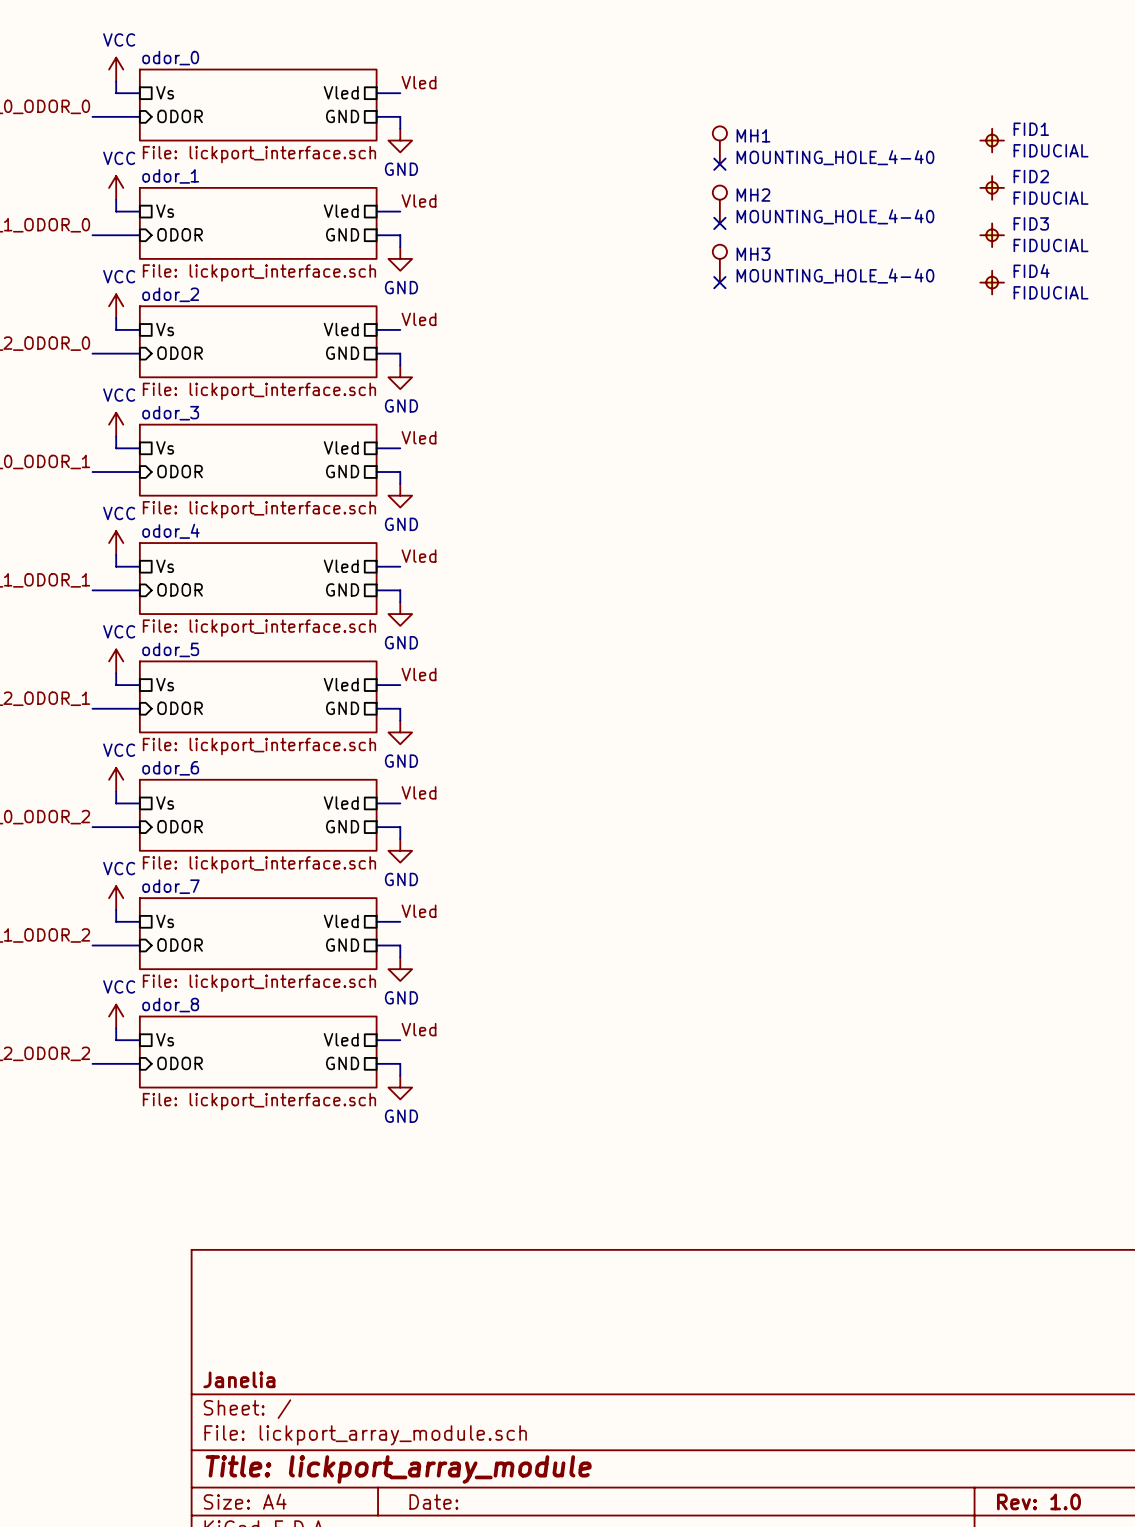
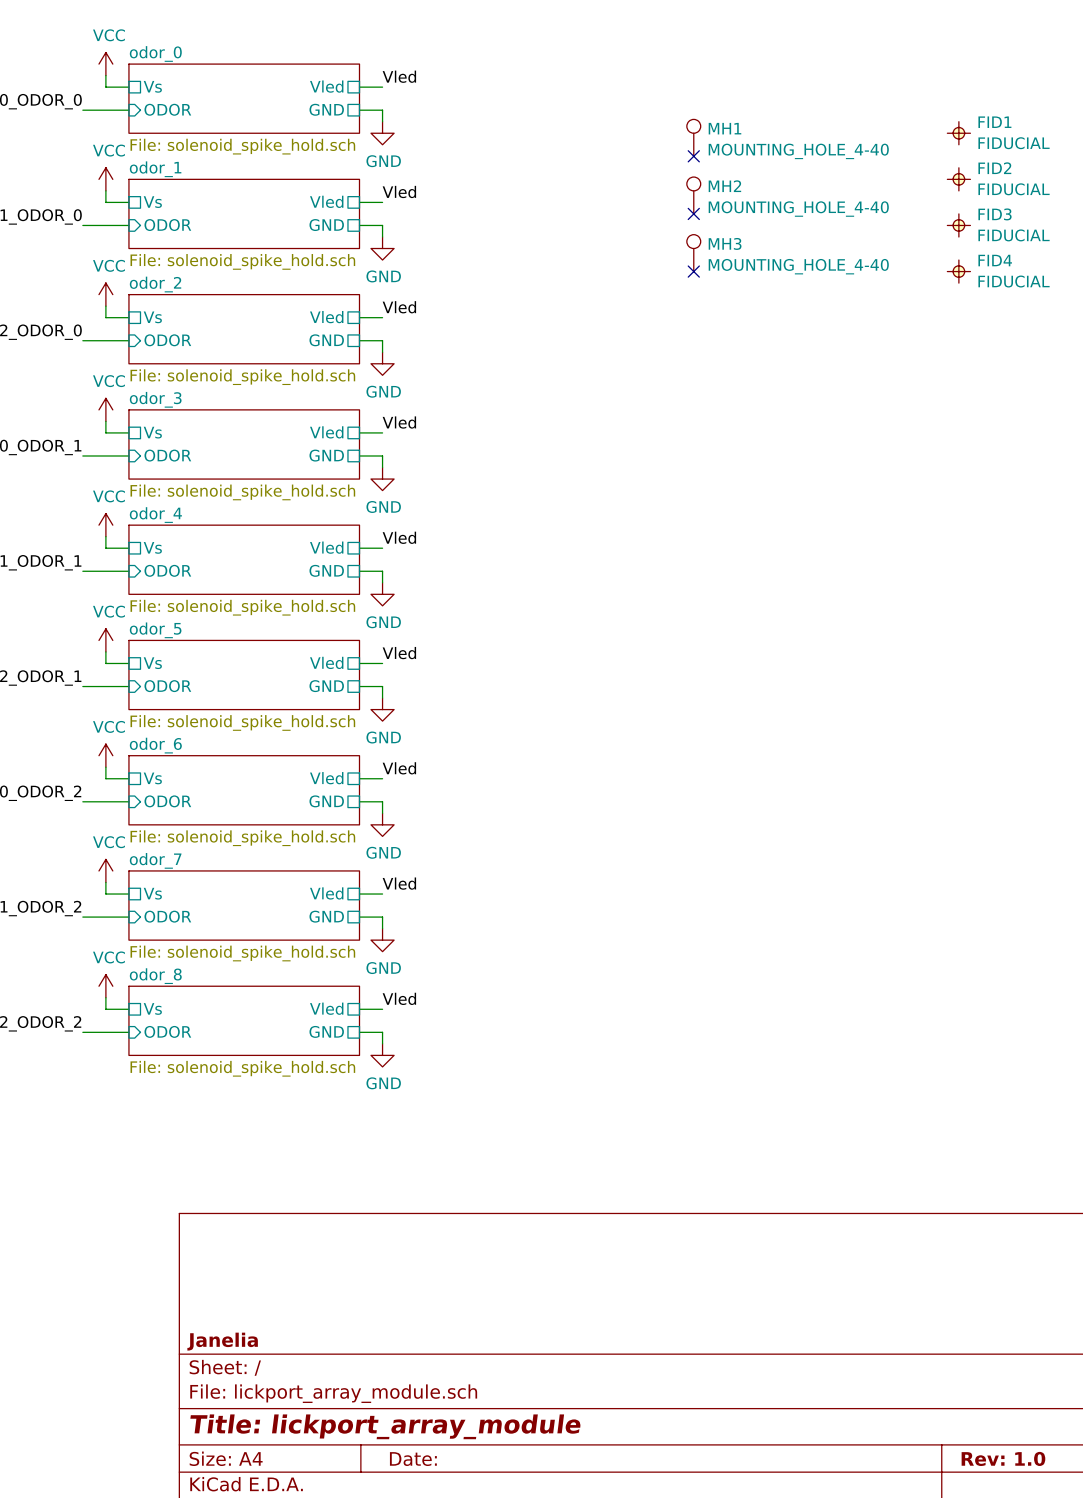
sheet odor_0 value: File: lickport_interface.sch (259, 154) -> File: solenoid_spike_hold.sch (242, 146)
sheet odor_1 value: File: lickport_interface.sch (259, 272) -> File: solenoid_spike_hold.sch (242, 261)
sheet odor_2 value: File: lickport_interface.sch (259, 391) -> File: solenoid_spike_hold.sch (242, 377)
sheet odor_3 value: File: lickport_interface.sch (259, 509) -> File: solenoid_spike_hold.sch (242, 492)
sheet odor_4 value: File: lickport_interface.sch (259, 628) -> File: solenoid_spike_hold.sch (242, 607)
sheet odor_5 value: File: lickport_interface.sch (259, 746) -> File: solenoid_spike_hold.sch (242, 722)
sheet odor_6 value: File: lickport_interface.sch (259, 864) -> File: solenoid_spike_hold.sch (242, 838)
sheet odor_7 value: File: lickport_interface.sch (259, 983) -> File: solenoid_spike_hold.sch (242, 953)
sheet odor_8 value: File: lickport_interface.sch (259, 1101) -> File: solenoid_spike_hold.sch (242, 1068)

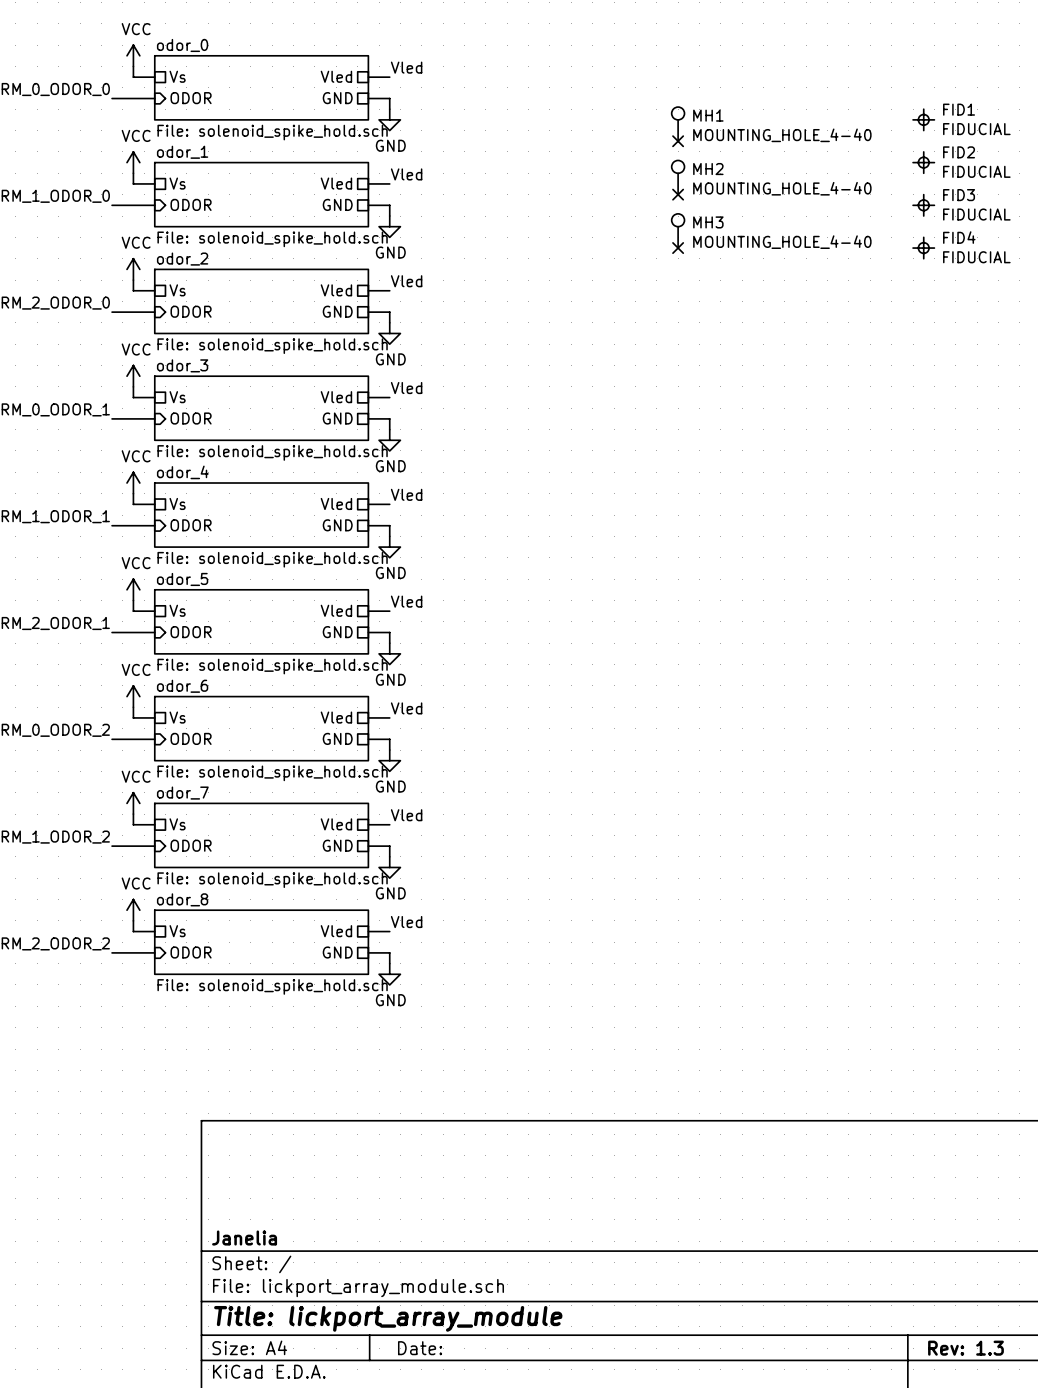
title block: Rev: 1.0 (1003, 1458) -> Rev: 1.3 (965, 1348)

